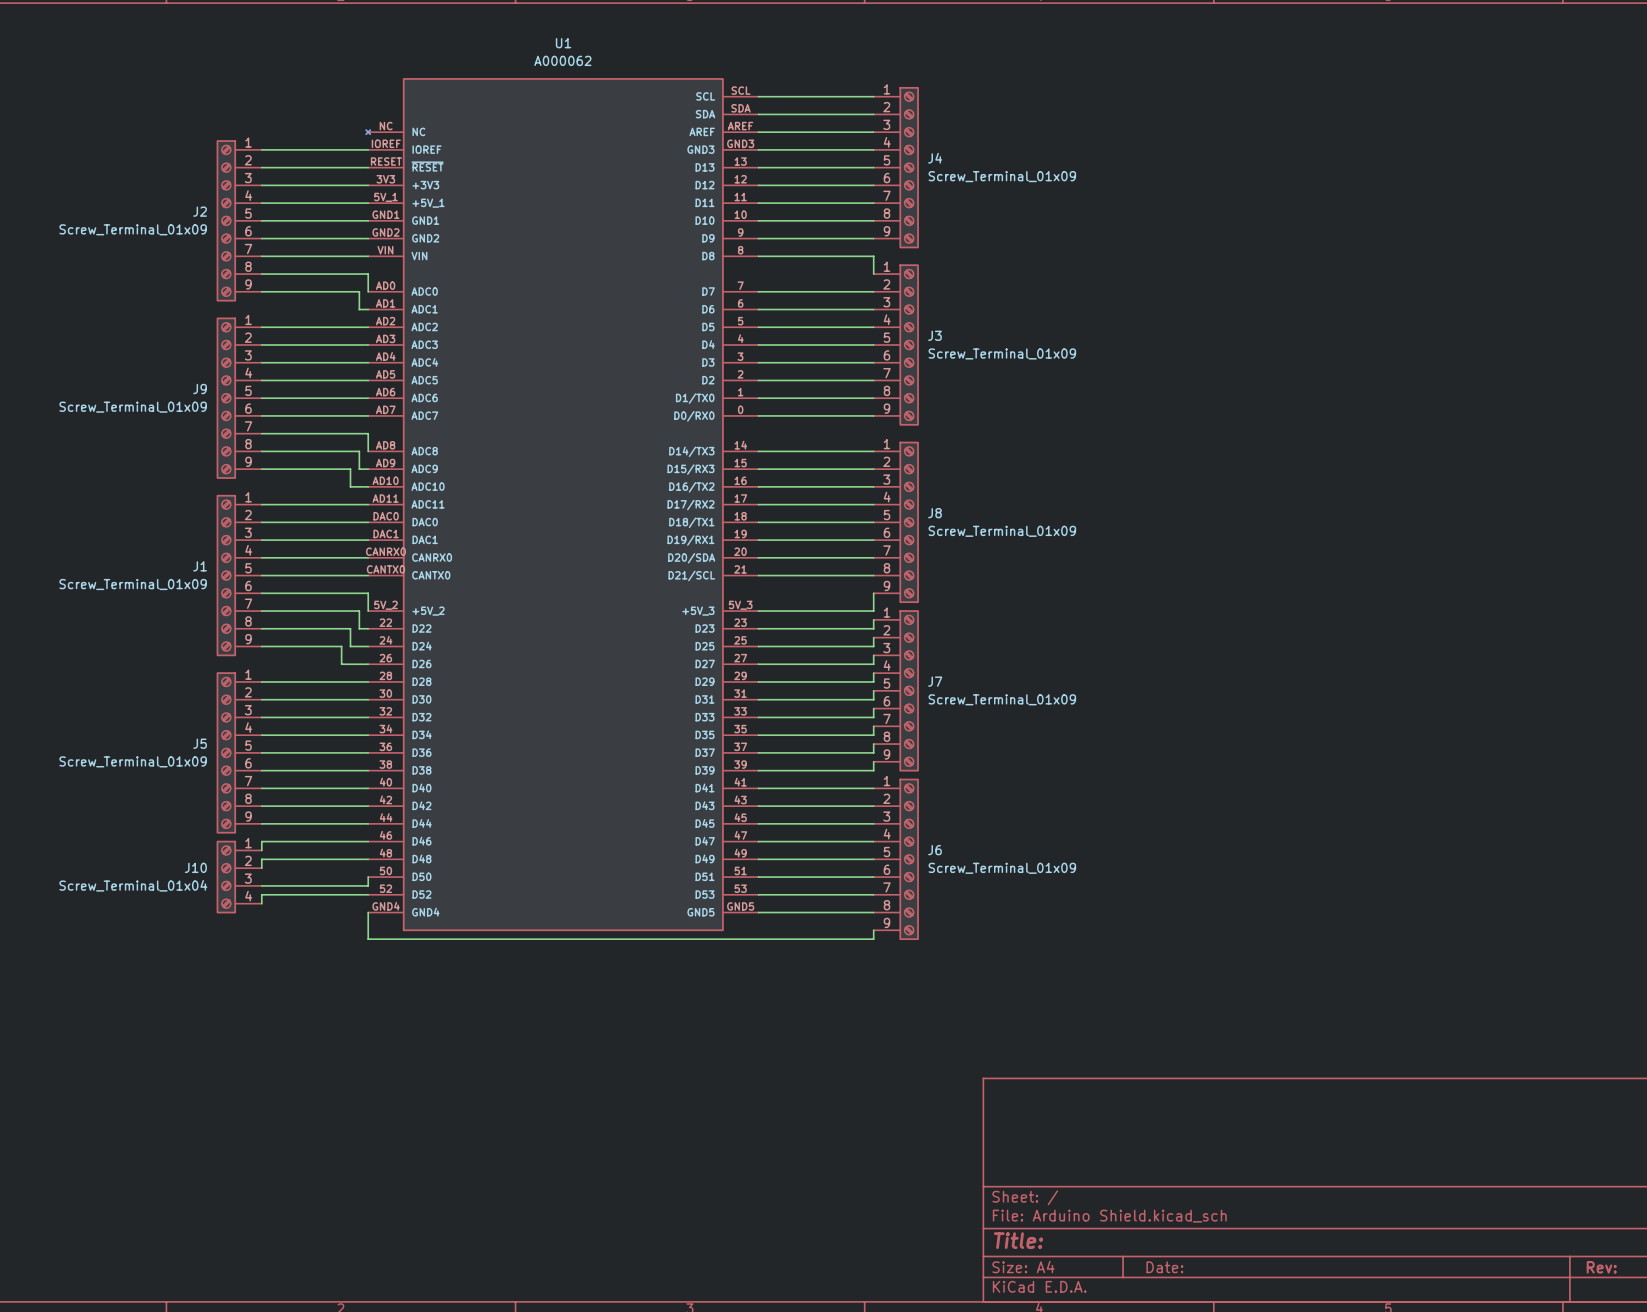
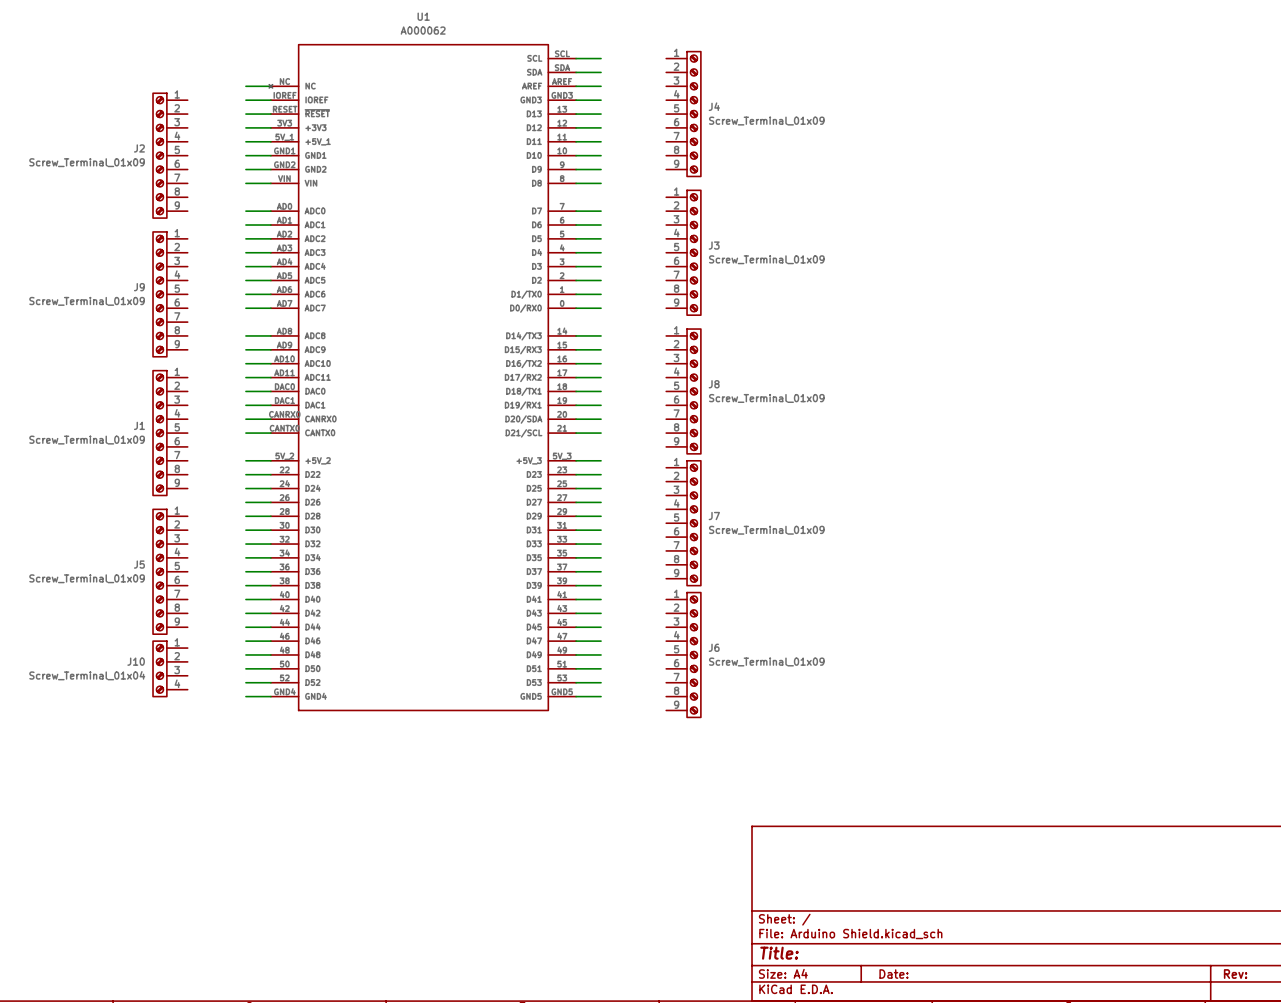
wire: (790, 96) (873, 96) -> none
wire: (790, 114) (873, 114) -> none
wire: none -> (245, 86) (270, 86)
wire: (790, 132) (873, 132) -> none
wire: (261, 149) (336, 149) -> none
wire: (790, 149) (873, 149) -> none
wire: (261, 167) (336, 167) -> none
wire: (790, 167) (873, 167) -> none
wire: (261, 185) (336, 185) -> none
wire: (790, 185) (873, 185) -> none
wire: (261, 203) (336, 203) -> none
wire: (790, 203) (873, 203) -> none
wire: (261, 220) (336, 220) -> none
wire: (790, 220) (873, 220) -> none
wire: (261, 238) (336, 238) -> none
wire: (790, 238) (873, 238) -> none
wire: (261, 256) (336, 256) -> none
wire: (790, 256) (873, 256) (873, 274) -> none
wire: (261, 274) (368, 274) (368, 291) -> none
wire: (261, 291) (336, 291) -> none
wire: (359, 291) (359, 309) -> (263, 211) (270, 211)
wire: (790, 291) (873, 291) -> none
wire: none -> (245, 225) (263, 225)
wire: (790, 309) (873, 309) -> none
wire: (261, 327) (336, 327) -> none
wire: (790, 327) (873, 327) -> none
wire: (261, 344) (336, 344) -> none
wire: (790, 344) (873, 344) -> none
wire: (261, 362) (336, 362) -> none
wire: (790, 362) (873, 362) -> none
wire: (261, 380) (336, 380) -> none
wire: (790, 380) (873, 380) -> none
wire: (261, 398) (336, 398) -> none
wire: (790, 398) (873, 398) -> none
wire: (261, 415) (336, 415) -> none
wire: (790, 415) (873, 415) -> none
wire: (261, 433) (368, 433) (368, 451) -> (263, 335) (270, 335)
wire: (261, 451) (336, 451) -> none
wire: (359, 451) (359, 469) -> (257, 349) (263, 349)
wire: (790, 451) (873, 451) -> none
wire: (261, 469) (336, 469) -> none
wire: (350, 469) (350, 486) -> (245, 363) (257, 363)
wire: (790, 469) (873, 469) -> none
wire: (790, 486) (873, 486) -> none
wire: (261, 504) (336, 504) -> none
wire: (790, 504) (873, 504) -> none
wire: (261, 522) (336, 522) -> none
wire: (790, 522) (873, 522) -> none
wire: (261, 540) (336, 540) -> none
wire: (790, 540) (873, 540) -> none
wire: (261, 557) (336, 557) -> none
wire: (790, 557) (873, 557) -> none
wire: (261, 575) (336, 575) -> none
wire: (790, 575) (873, 575) -> none
wire: (261, 593) (368, 593) (368, 611) -> (263, 460) (270, 460)
wire: (873, 593) (873, 611) (790, 611) -> none
wire: (261, 611) (336, 611) -> none
wire: (359, 611) (359, 628) -> (257, 474) (263, 474)
wire: (873, 619) (873, 628) (790, 628) -> none
wire: (261, 628) (336, 628) -> none
wire: (350, 628) (350, 646) -> (250, 488) (257, 488)
wire: (873, 637) (873, 646) (790, 646) -> none
wire: (261, 646) (336, 646) -> none
wire: (341, 646) (341, 664) -> (245, 502) (250, 502)
wire: (873, 655) (873, 664) (790, 664) -> none
wire: (873, 673) (873, 681) (790, 681) -> none
wire: (261, 681) (336, 681) -> none
wire: (873, 690) (873, 699) (790, 699) -> none
wire: (261, 699) (336, 699) -> none
wire: (873, 708) (873, 717) (790, 717) -> none
wire: (261, 717) (336, 717) -> none
wire: (873, 726) (873, 735) (790, 735) -> none
wire: (261, 735) (336, 735) -> none
wire: (873, 744) (873, 752) (790, 752) -> none
wire: (261, 752) (336, 752) -> none
wire: (873, 761) (873, 770) (790, 770) -> none
wire: (261, 770) (336, 770) -> none
wire: (261, 788) (336, 788) -> none
wire: (790, 788) (873, 788) -> none
wire: (261, 806) (336, 806) -> none
wire: (790, 806) (873, 806) -> none
wire: (261, 823) (336, 823) -> none
wire: (790, 823) (873, 823) -> none
wire: (336, 841) (261, 841) (261, 850) -> none
wire: (790, 841) (873, 841) -> none
wire: (336, 859) (261, 859) (261, 868) -> none
wire: (790, 859) (873, 859) -> none
wire: (368, 877) (368, 885) (261, 885) -> (270, 668) (245, 668)
wire: (790, 877) (873, 877) -> none
wire: (336, 894) (261, 894) (261, 903) -> none
wire: (790, 894) (873, 894) -> none
wire: (368, 912) (368, 939) (873, 939) (873, 930) -> (270, 696) (245, 696)
wire: (790, 912) (873, 912) -> none

